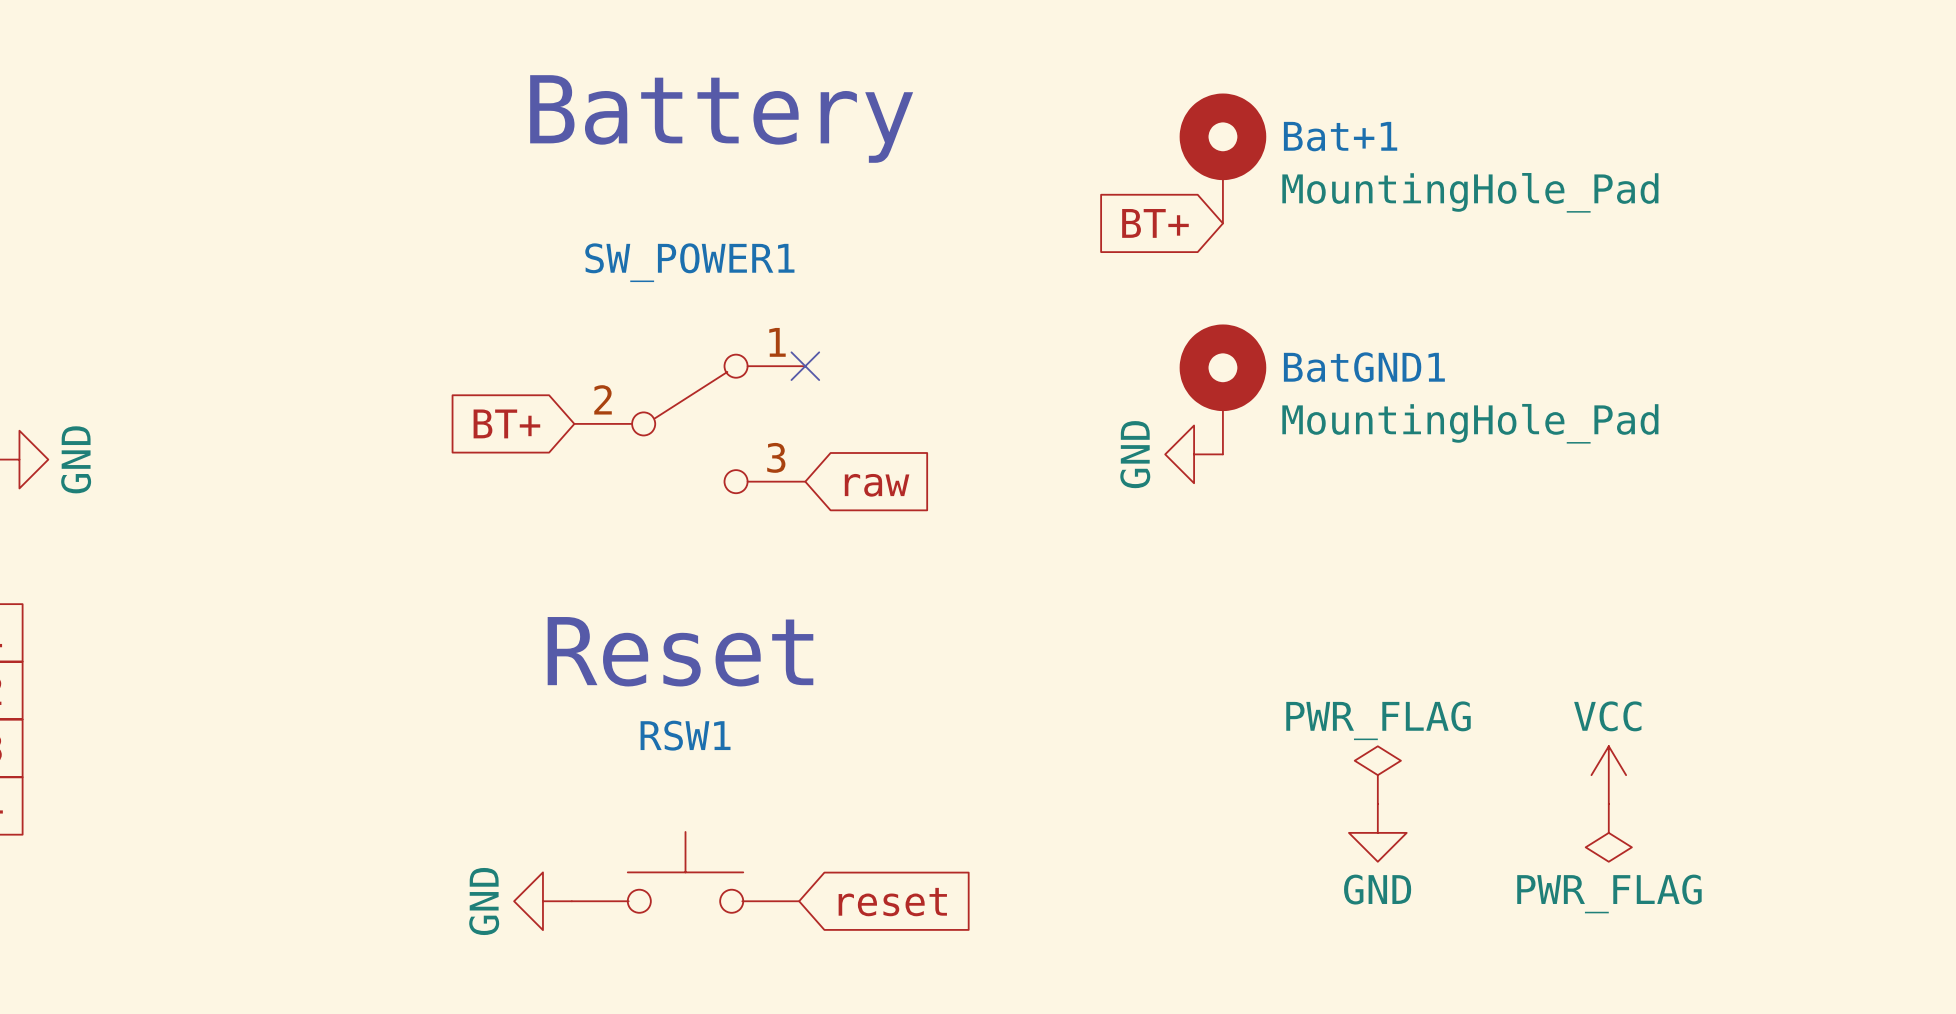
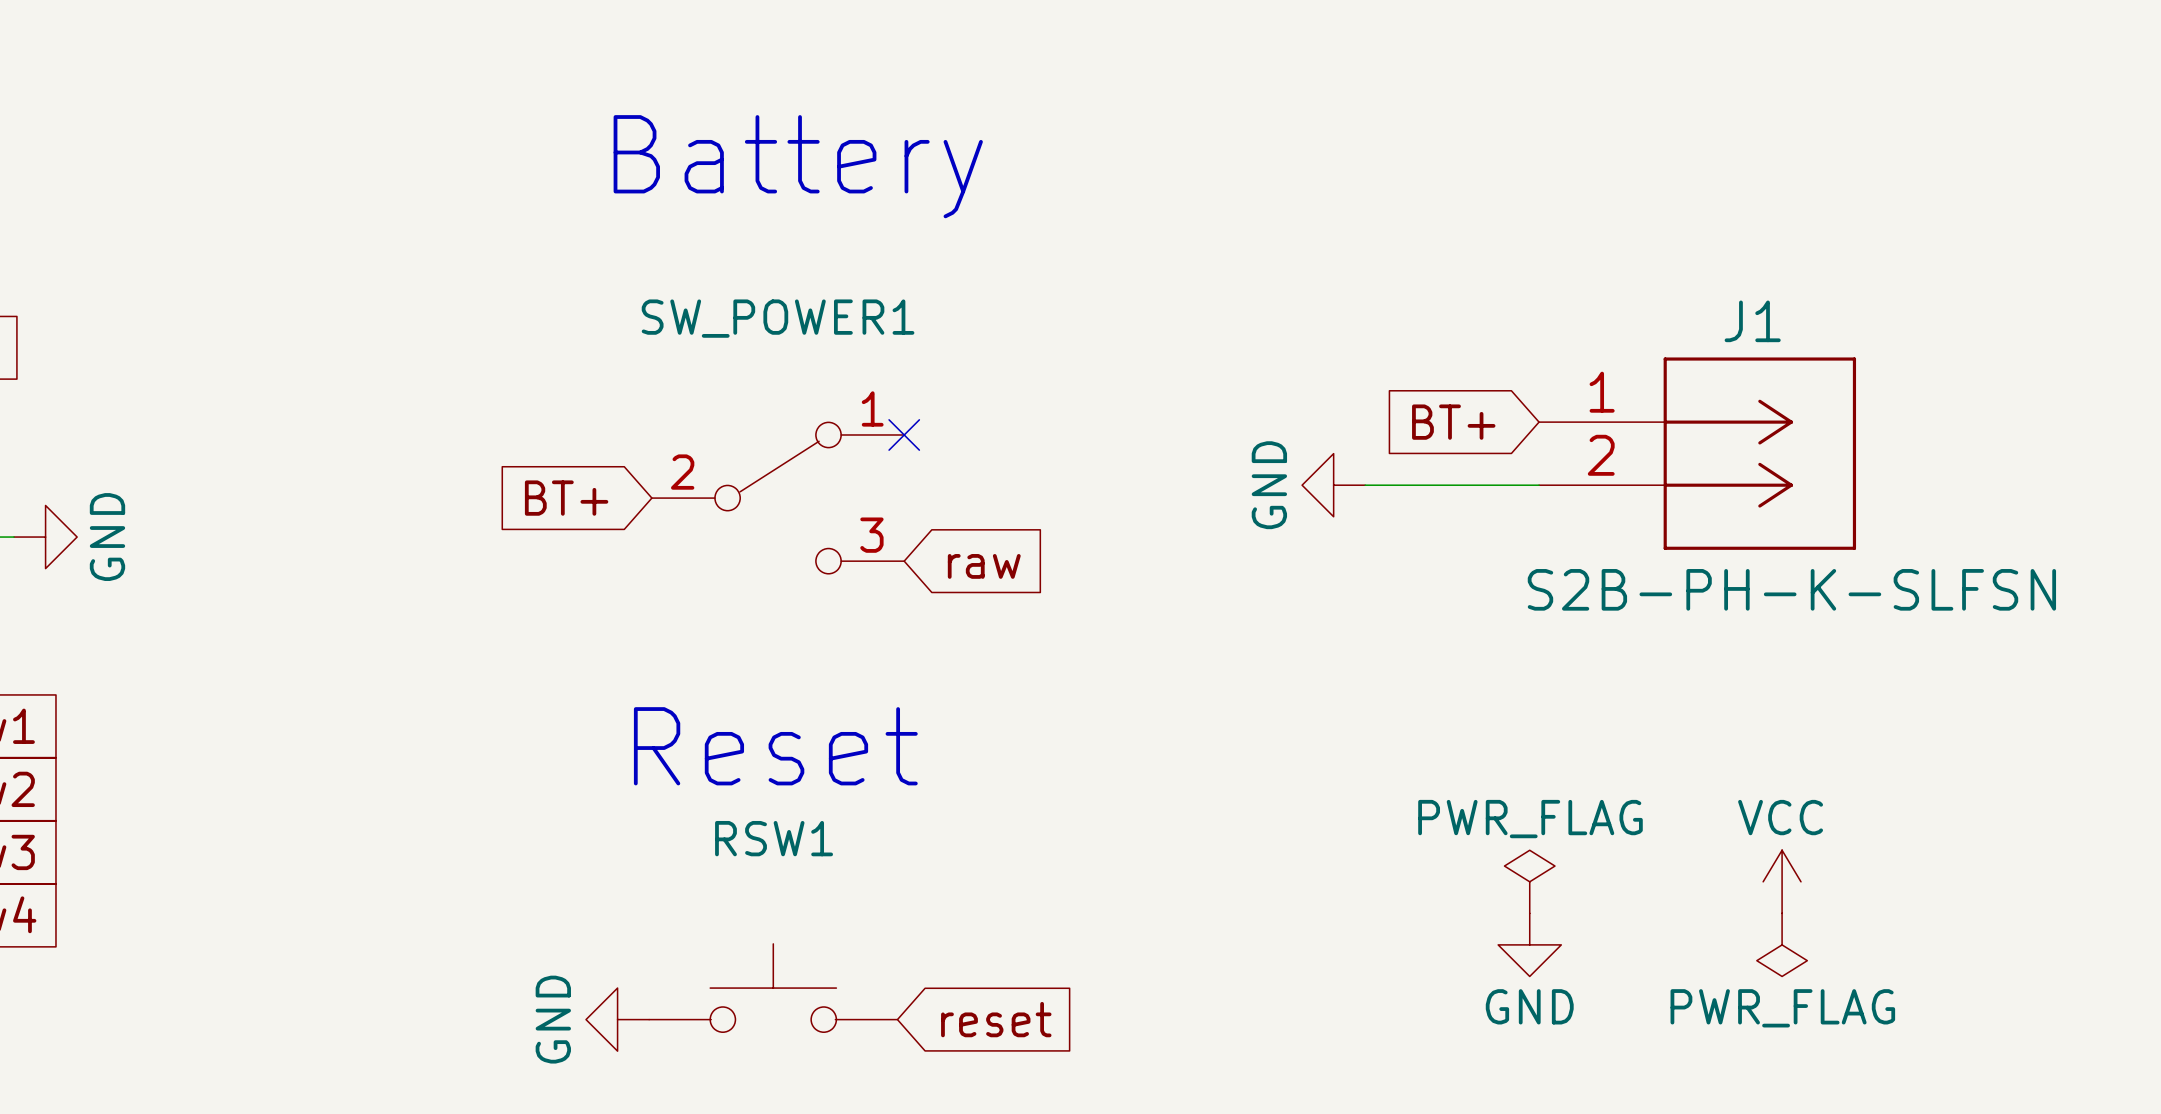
Bat+1: MountingHole_Pad (1222, 158) -> none
global label position: BT+ (1155, 223) -> BT+ (1453, 422)
J1: none -> S2B-PH-K-SLFSN (1697, 453)
BatGND1: MountingHole_Pad (1222, 389) -> none
wire: none -> (1365, 485) (1539, 485)
power symbol position: GND (1194, 454) -> GND (1333, 485)

